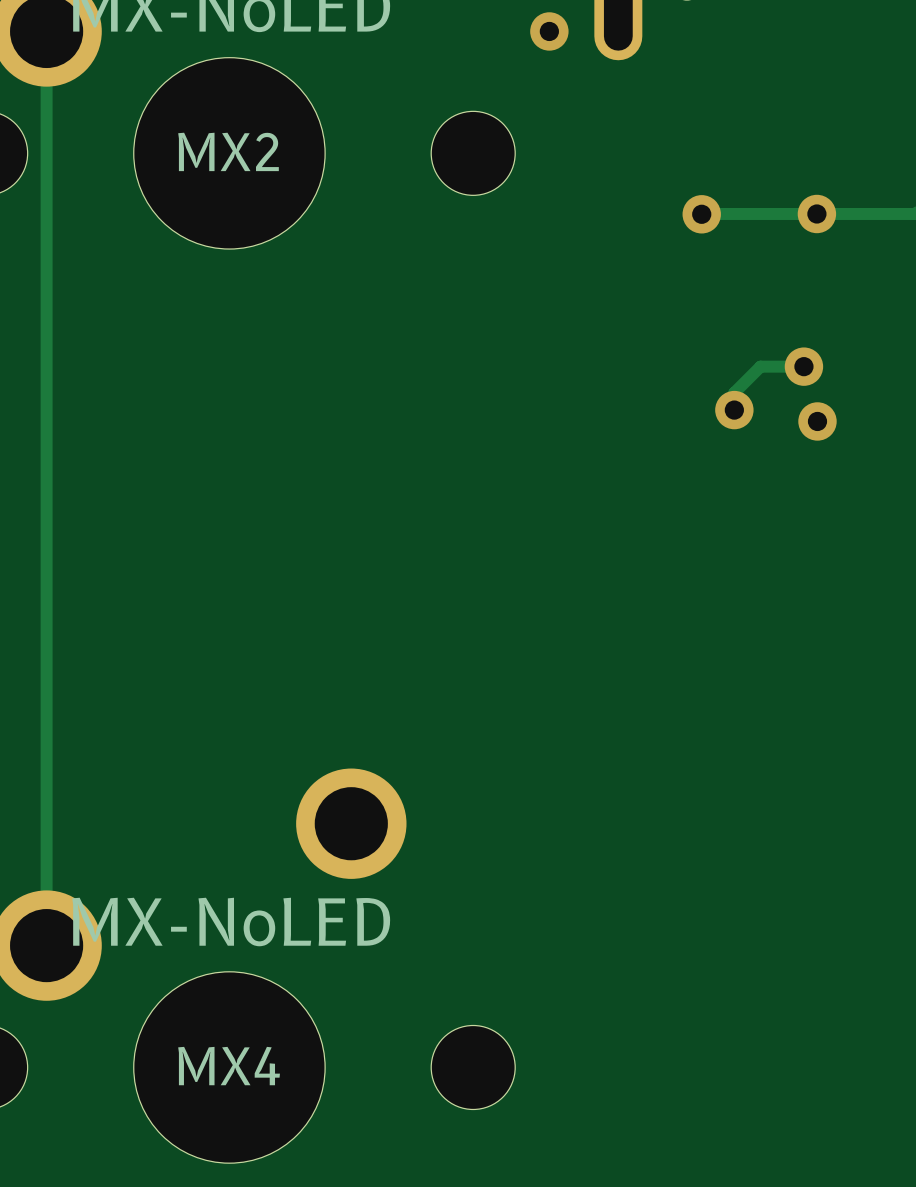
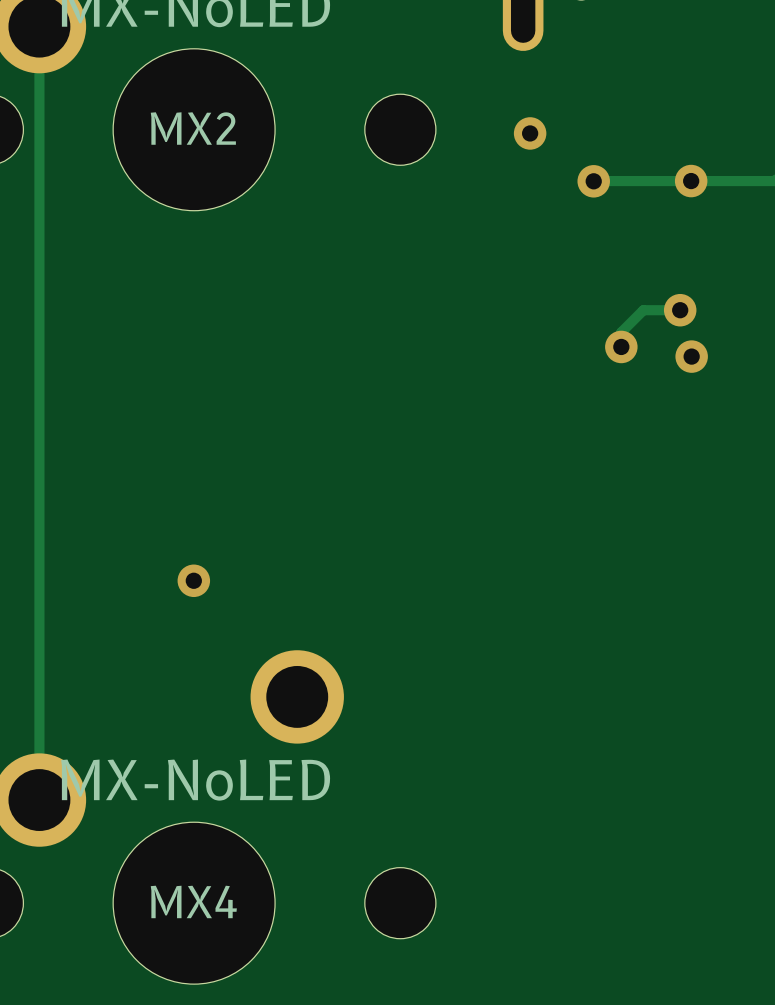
via: (549, 31) -> none
via: none -> (530, 133)
via: none -> (193, 580)

